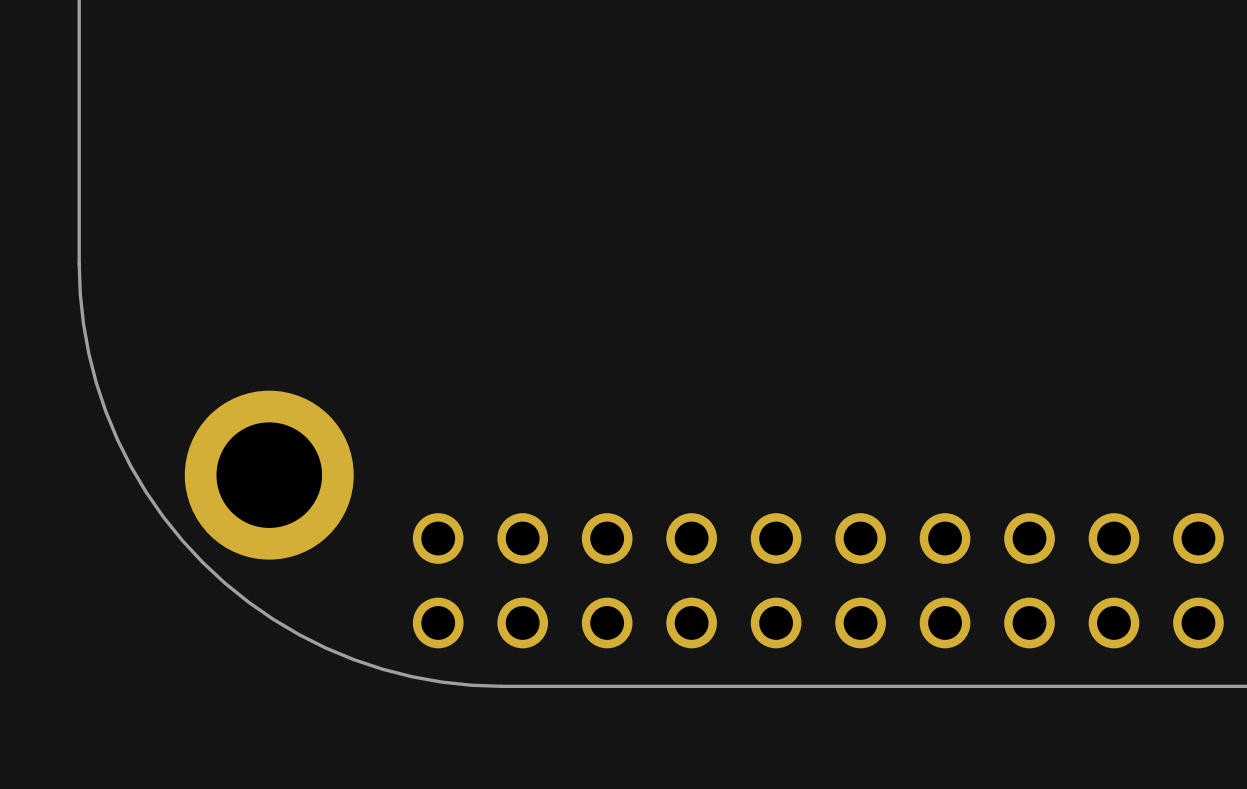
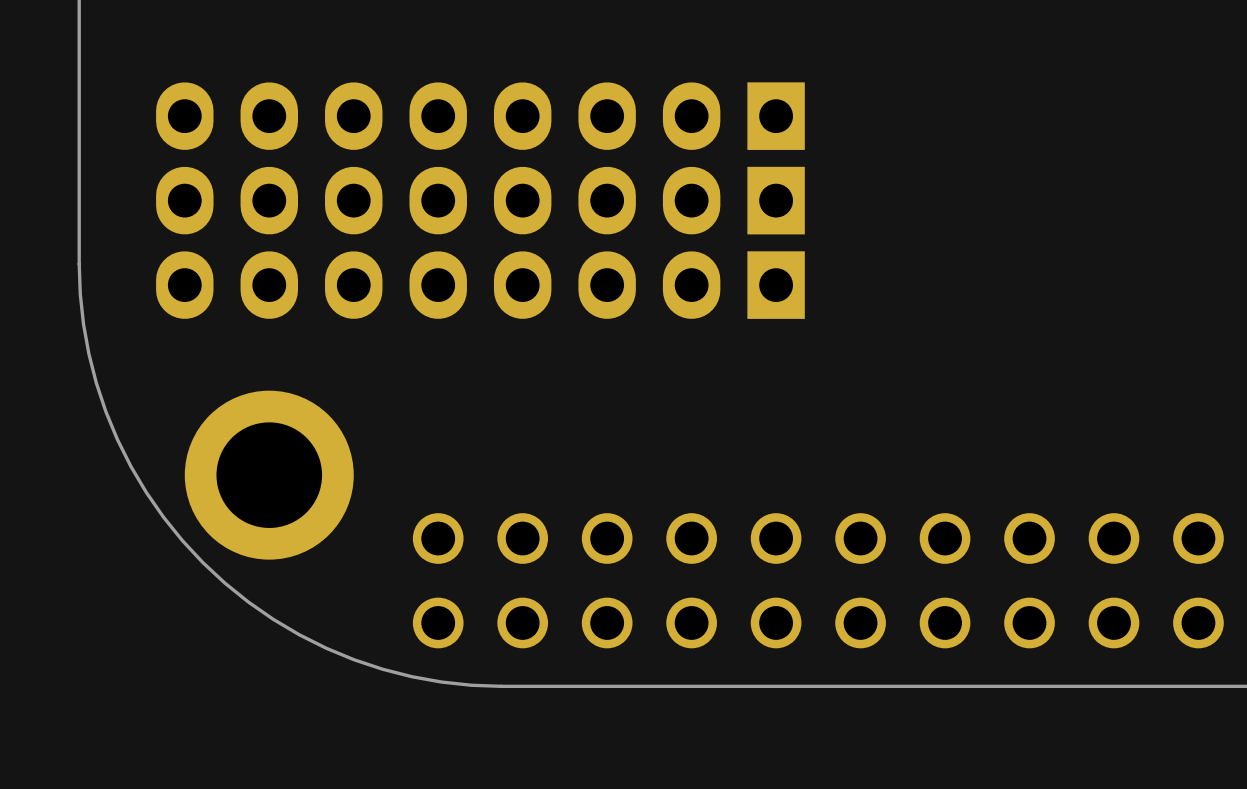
part: none -> (480, 116)
part: none -> (480, 200)
part: none -> (480, 285)

